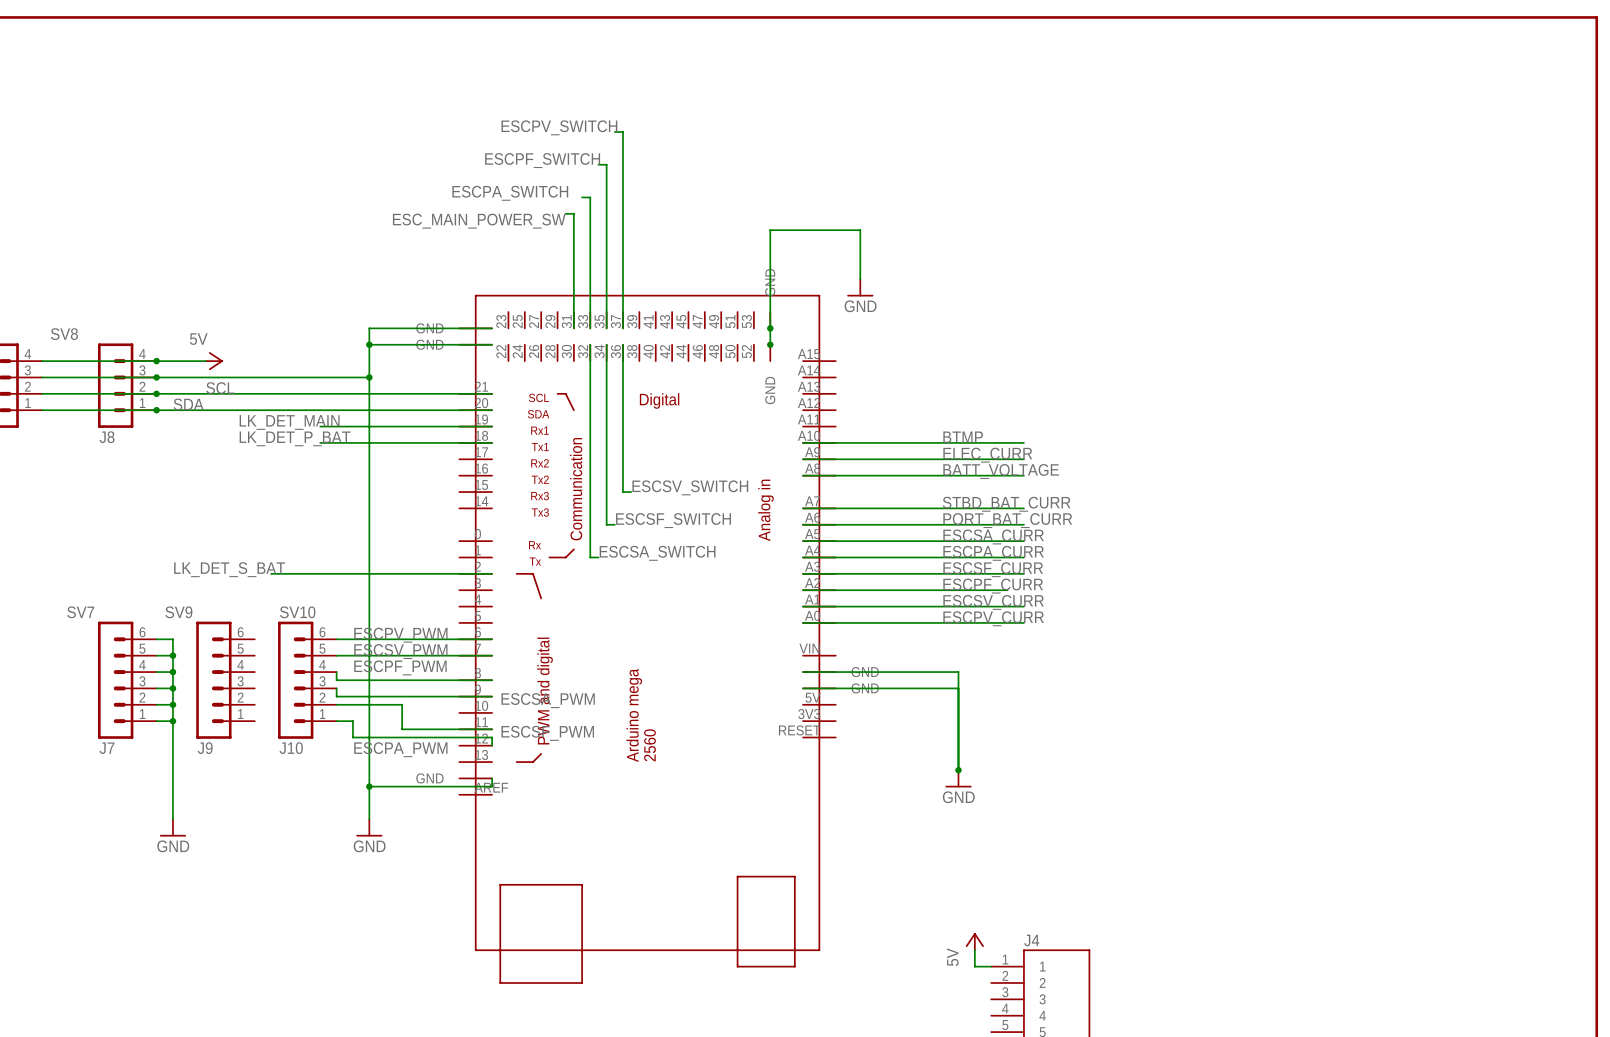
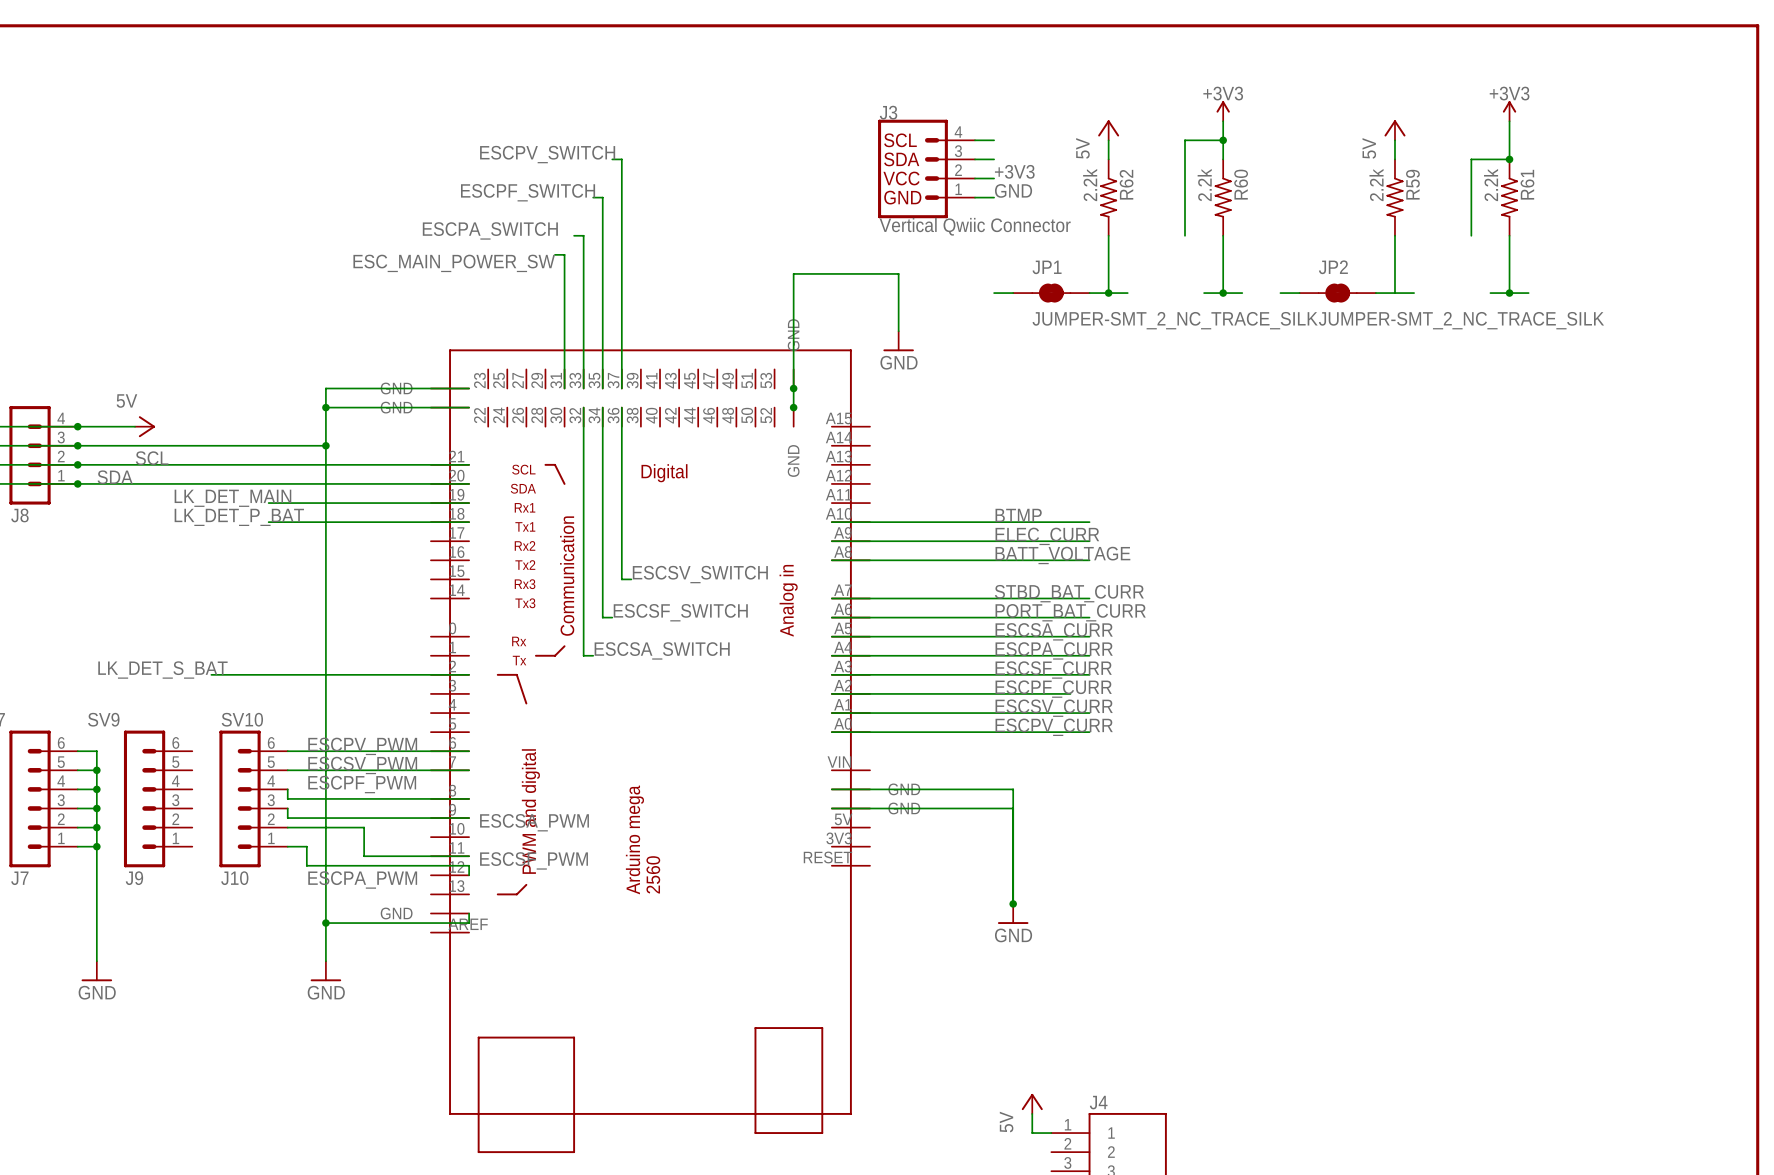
power symbol: none -> +3V3 (1223, 111)
power symbol: none -> +3V3 (1509, 111)
wire: none -> (1223, 121) (1223, 159)
wire: none -> (1509, 121) (1509, 159) (1471, 159) (1471, 235)
power symbol: none -> 5V (1108, 130)
power symbol: none -> 5V (1394, 130)
wire: none -> (975, 140) (994, 140)
wire: none -> (1108, 140) (1108, 159)
wire: none -> (1223, 140) (1184, 140) (1184, 235)
junction: none -> (1223, 140)
wire: none -> (1394, 140) (1394, 159)
wire: none -> (975, 159) (994, 159)
junction: none -> (1509, 159)
J3: none -> Vertical Qwiic Connector (926, 168)
label: none -> +3V3 (1014, 171)
wire: none -> (975, 178) (994, 178)
label: none -> GND (1013, 190)
wire: none -> (975, 197) (994, 197)
R62: none -> 2.2k (1108, 197)
R60: none -> 2.2k (1223, 197)
R59: none -> 2.2k (1394, 197)
R61: none -> 2.2k (1509, 197)
wire: none -> (1108, 235) (1108, 293)
wire: none -> (1223, 235) (1223, 293)
wire: none -> (1394, 235) (1394, 293)
wire: none -> (1509, 235) (1509, 293)
wire: none -> (994, 293) (1013, 293)
JP1: none -> JUMPER-SMT_2_NC_TRACE_SILK (1051, 293)
wire: none -> (1089, 293) (1127, 293)
junction: none -> (1108, 293)
wire: none -> (1204, 293) (1242, 293)
junction: none -> (1223, 293)
wire: none -> (1280, 293) (1299, 293)
JP2: none -> JUMPER-SMT_2_NC_TRACE_SILK (1337, 293)
wire: none -> (1375, 293) (1414, 293)
wire: none -> (1490, 293) (1528, 293)
junction: none -> (1509, 293)

